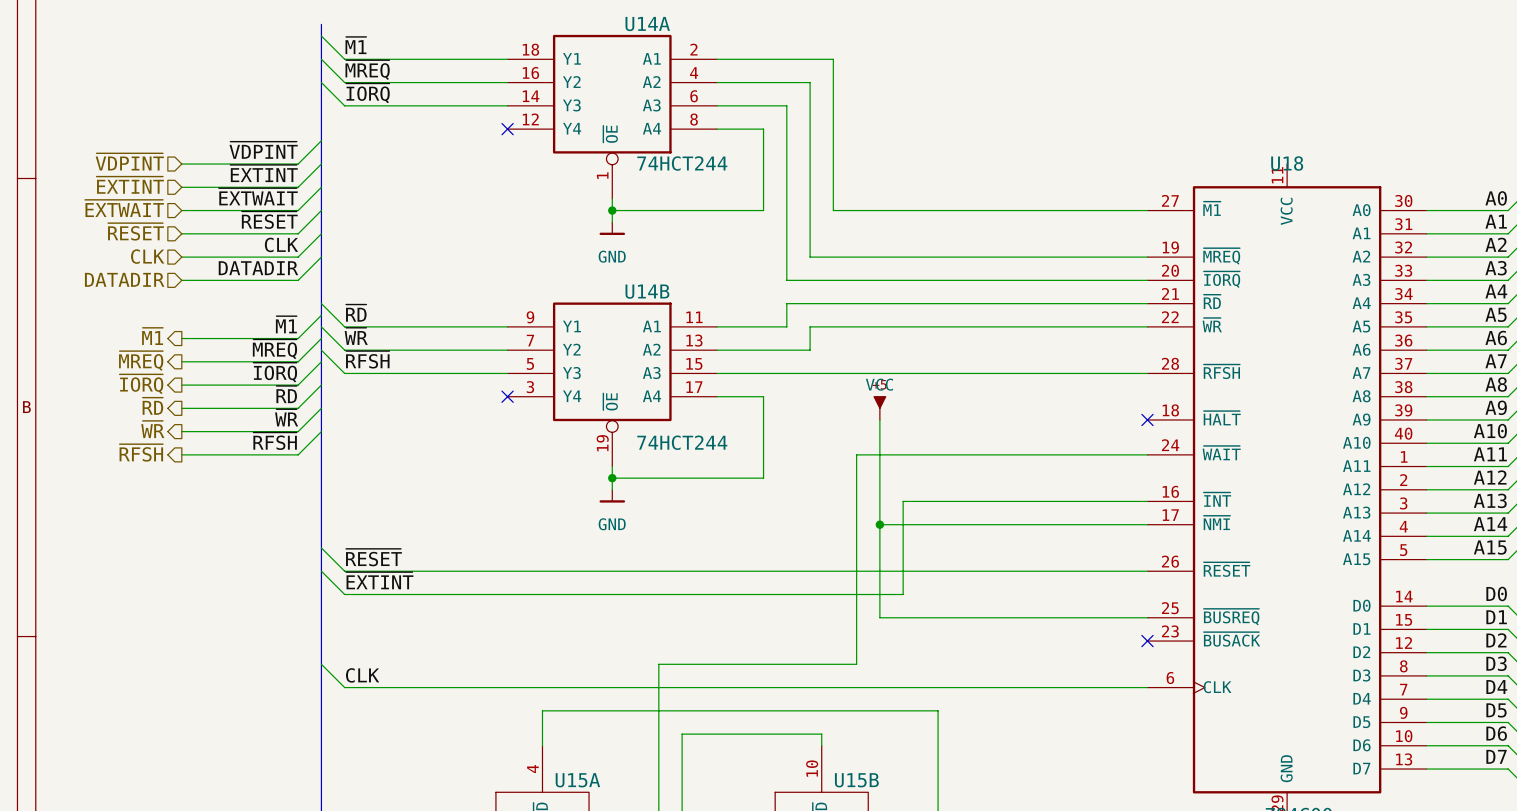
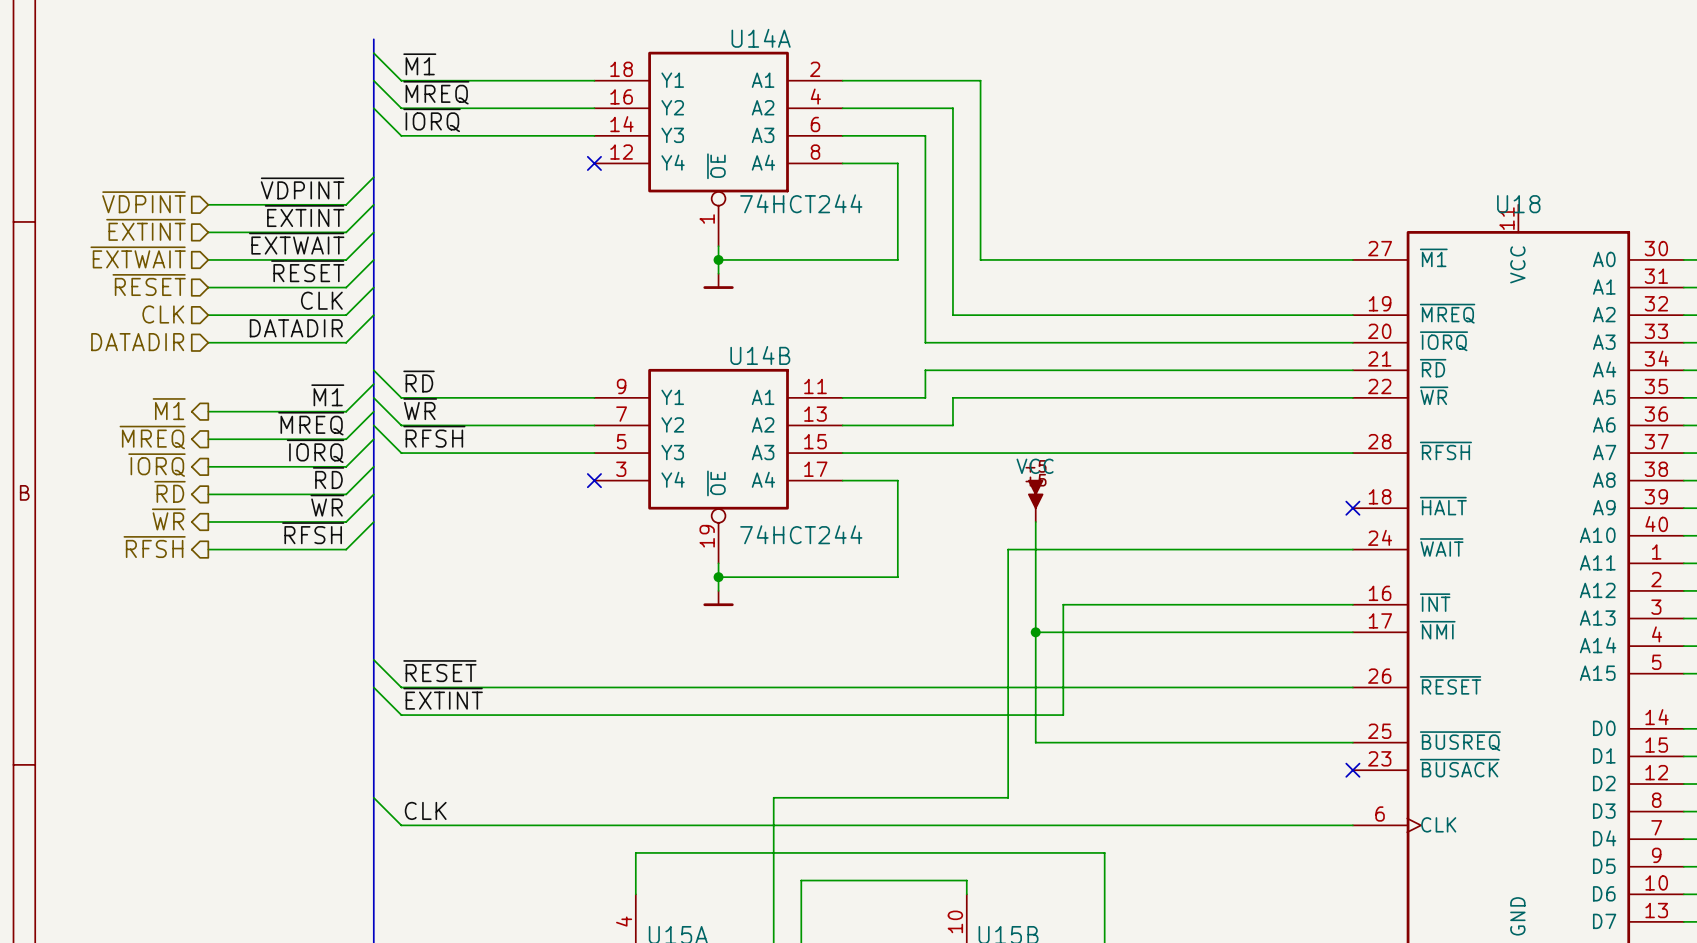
power symbol text: GND (612, 256) -> none
power symbol: none -> (1035, 508)
power symbol text: GND (612, 524) -> none

